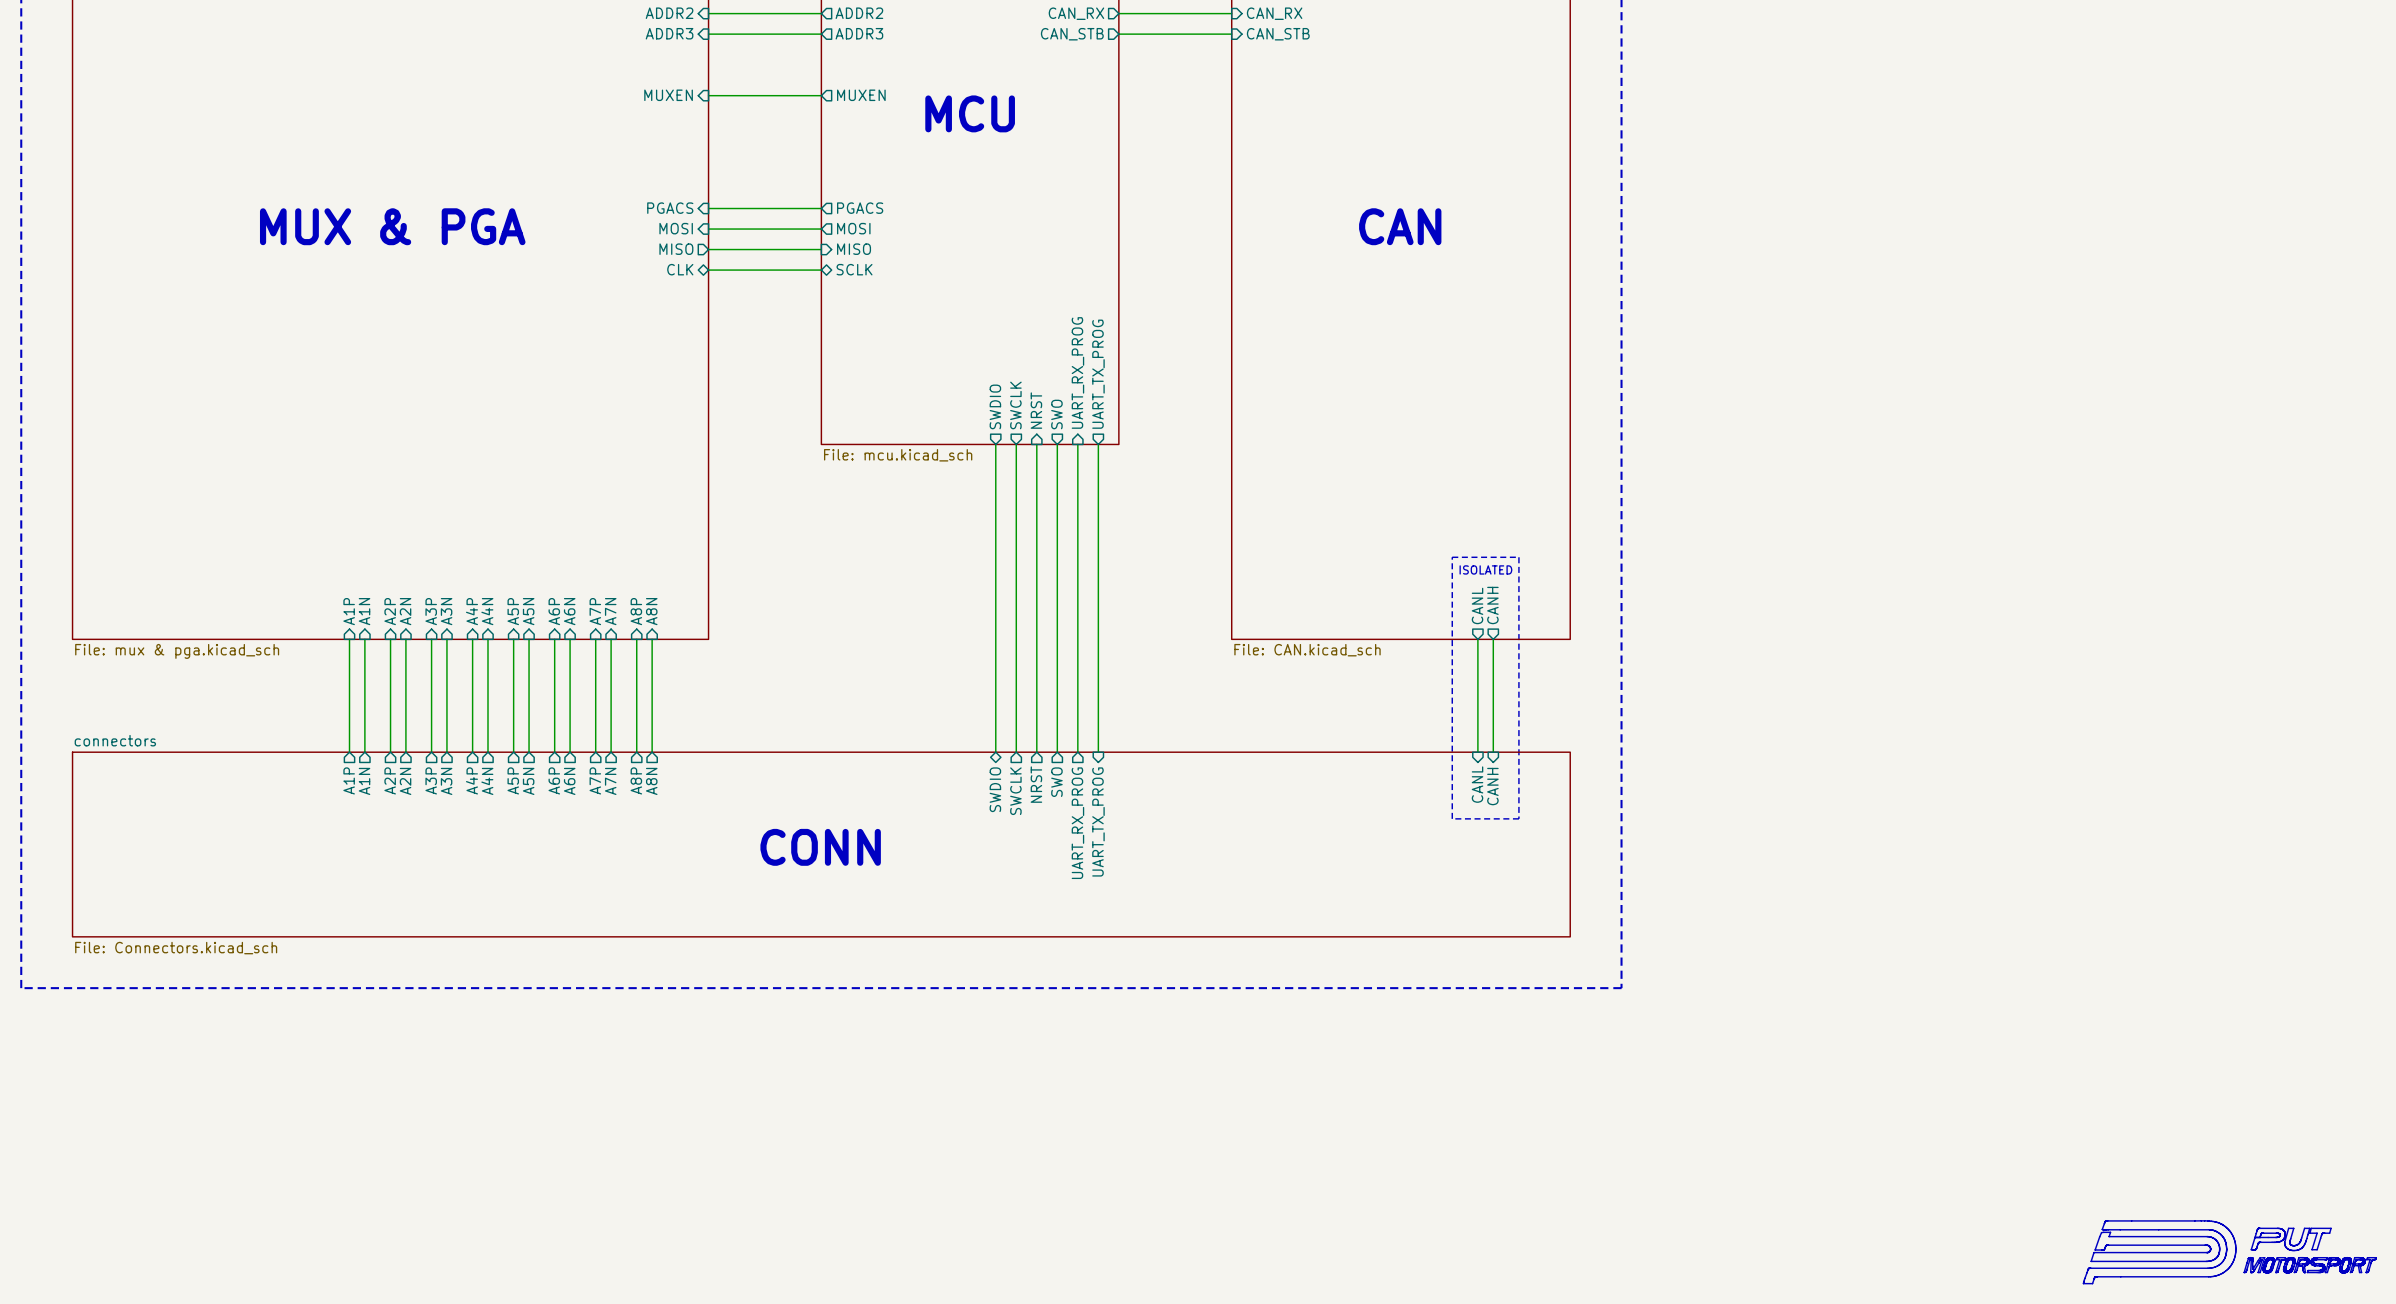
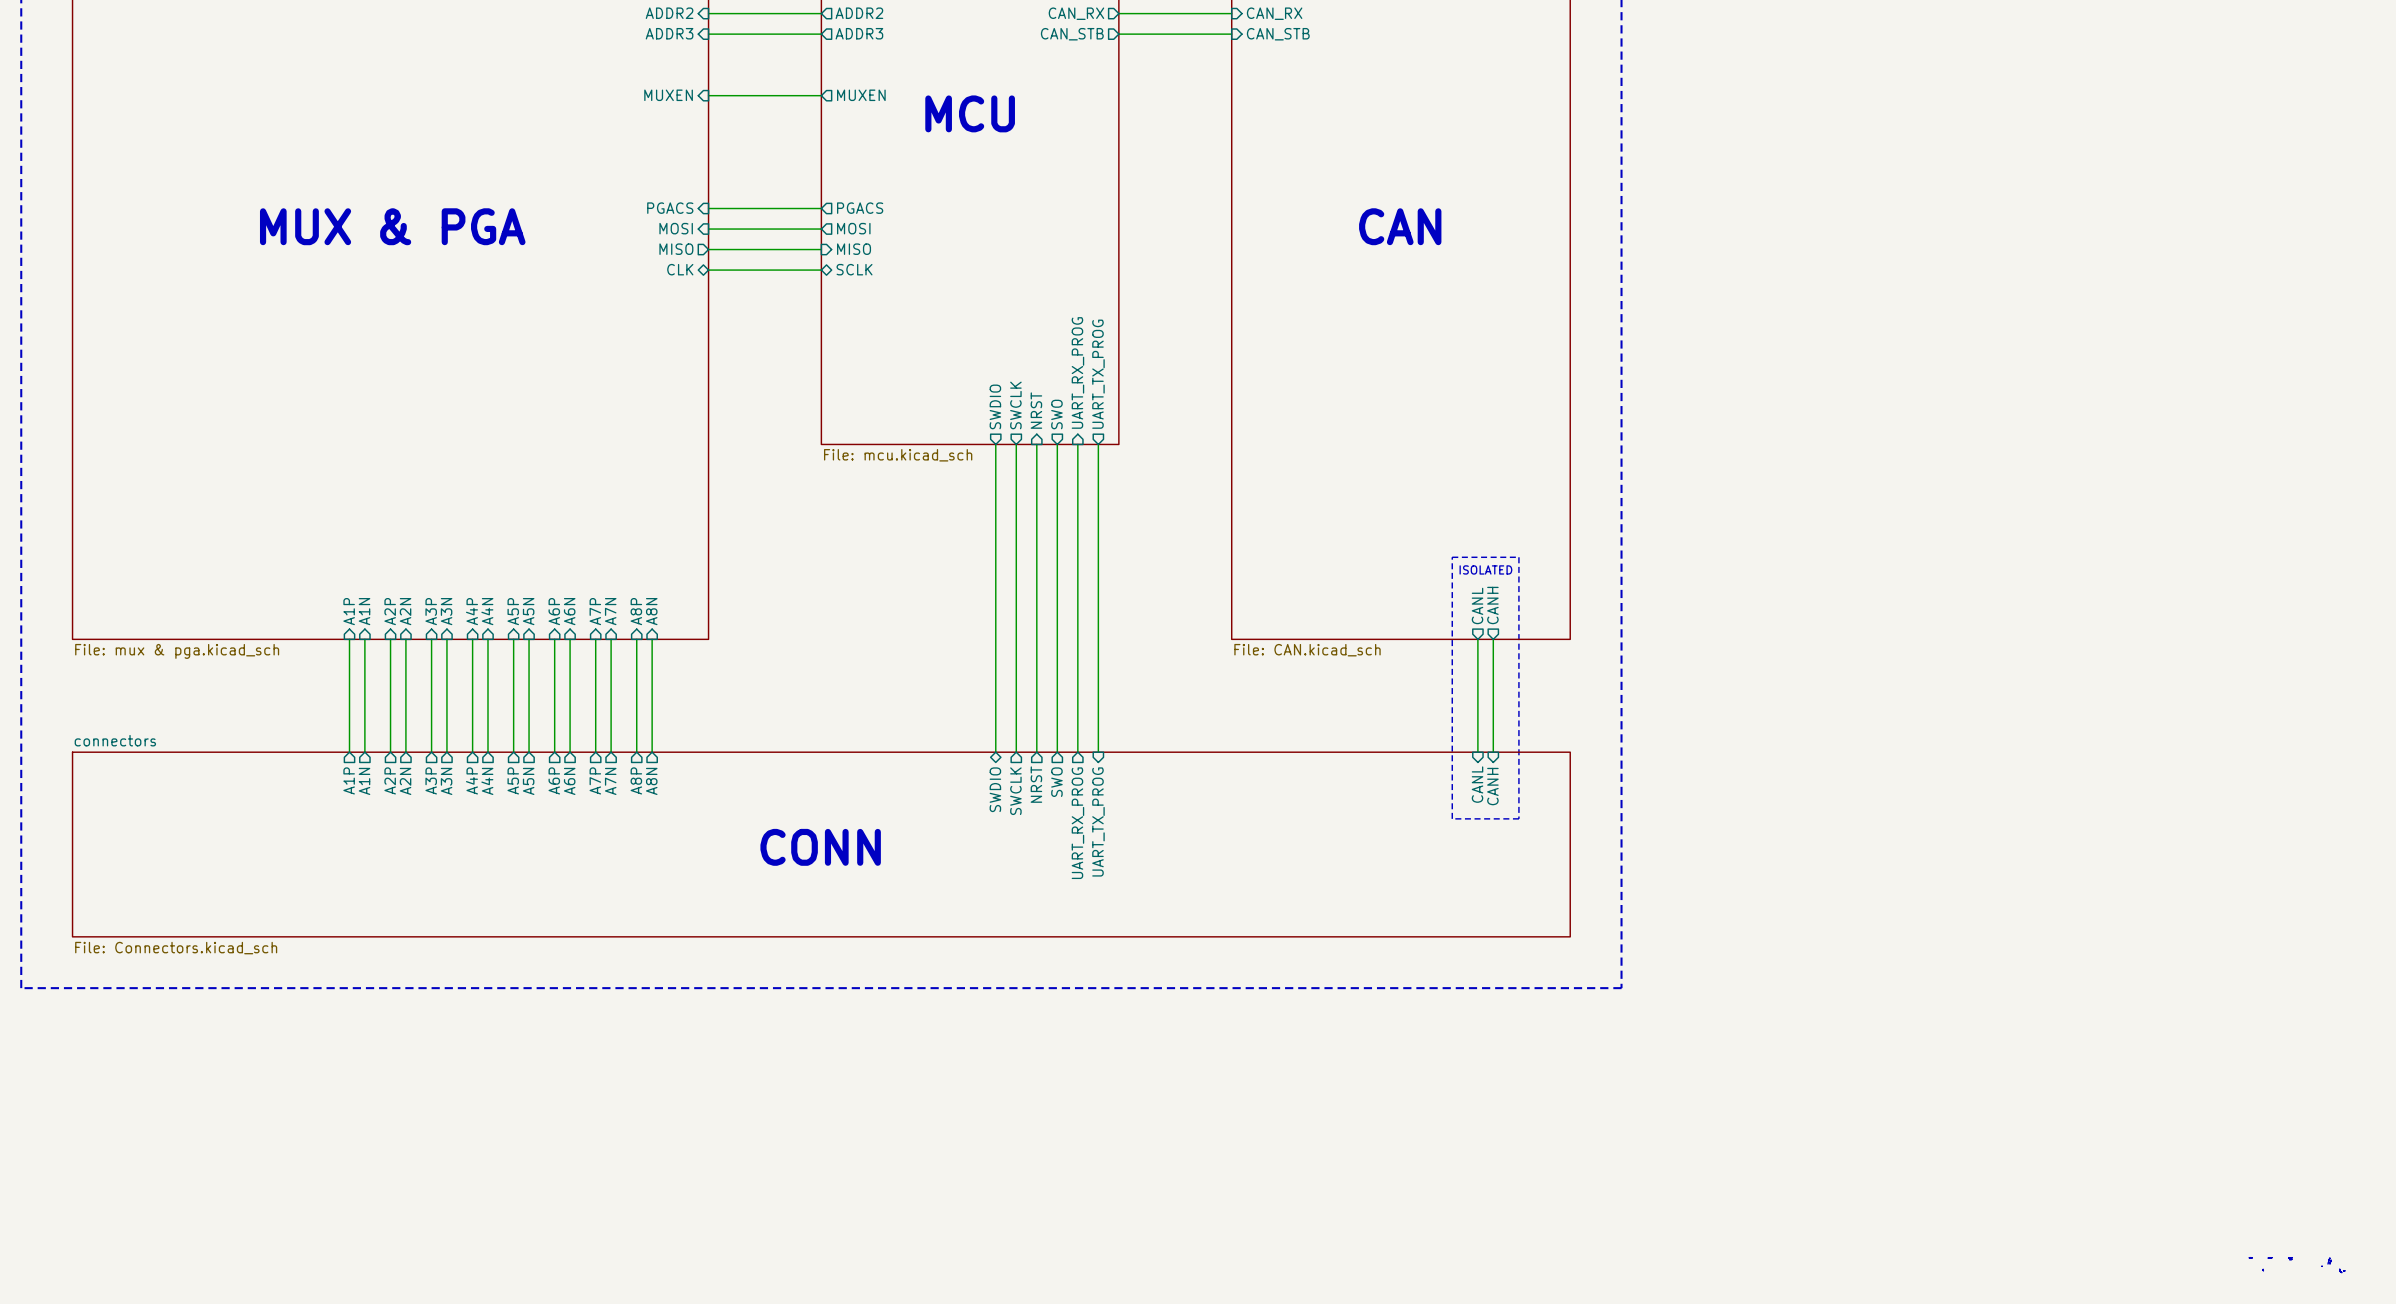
line: (2106, 1220) (2216, 1222) (2224, 1226) (2232, 1234) (2235, 1244) (2235, 1255) (2227, 1269) (2213, 1276) (2096, 1276) -> none
line: (2105, 1221) (2102, 1229) (2213, 1230) (2220, 1234) (2224, 1239) (2225, 1255) (2219, 1264) (2210, 1268) (2090, 1268) -> none
line: (2257, 1228) (2255, 1237) -> none
line: (2259, 1228) (2280, 1228) (2285, 1234) (2283, 1238) (2279, 1241) (2260, 1242) -> none
line: (2261, 1233) (2260, 1237) -> none
line: (2262, 1233) (2279, 1233) -> none
line: (2322, 1233) (2329, 1233) (2331, 1228) (2311, 1228) (2310, 1233) (2317, 1233) (2311, 1249) (2317, 1249) (2322, 1233) -> none
line: (2279, 1236) (2255, 1237) -> none
line: (2255, 1237) (2251, 1249) (2255, 1249) -> none
line: (2258, 1242) (2256, 1249) -> none
line: (2289, 1242) (2293, 1228) (2288, 1228) (2284, 1244) (2287, 1248) (2293, 1250) (2299, 1249) (2303, 1245) (2309, 1228) (2304, 1228) (2298, 1244) (2293, 1245) (2289, 1243) -> none
line: (2107, 1245) (2208, 1245) -> none
line: (2105, 1246) (2104, 1249) -> none
line: (2209, 1246) (2210, 1250) (2207, 1252) (2094, 1252) (2091, 1261) (2207, 1261) (2215, 1258) (2219, 1251) (2217, 1241) (2209, 1236) (2109, 1236) (2110, 1232) (2103, 1232) (2101, 1232) (2095, 1250) (2102, 1250) -> none
line: (2272, 1257) (2274, 1261) (2271, 1270) (2267, 1272) (2263, 1271) -> none
line: (2293, 1257) (2295, 1261) (2291, 1271) (2286, 1272) (2283, 1269) -> none
line: (2331, 1257) (2338, 1258) (2340, 1261) (2338, 1265) (2330, 1265) -> none
line: (2358, 1257) (2354, 1257) (2350, 1272) (2354, 1265) (2358, 1265) (2359, 1272) (2361, 1272) (2360, 1265) (2364, 1264) (2365, 1260) (2358, 1257) -> none
line: (2248, 1258) (2245, 1272) -> none
line: (2252, 1258) (2253, 1269) (2260, 1257) (2264, 1257) (2260, 1272) (2258, 1272) (2261, 1259) -> none
line: (2266, 1258) (2263, 1268) (2265, 1269) -> none
line: (2287, 1258) (2283, 1268) (2285, 1269) -> none
line: (2327, 1258) (2313, 1258) (2311, 1261) (2311, 1264) -> none
line: (2375, 1258) (2367, 1257) (2366, 1259) (2370, 1259) (2367, 1272) -> none
line: (2270, 1259) (2267, 1261) (2265, 1269) -> none
line: (2271, 1259) (2272, 1261) (2269, 1269) -> none
line: (2282, 1259) (2285, 1257) (2277, 1257) (2276, 1259) (2279, 1259) (2277, 1272) -> none
line: (2301, 1259) (2306, 1259) -> none
line: (2325, 1259) (2314, 1260) -> none
line: (2332, 1259) (2337, 1259) -> none
line: (2347, 1259) (2345, 1259) -> none
line: (2347, 1259) (2349, 1261) (2346, 1269) -> none
line: (2357, 1259) (2362, 1259) -> none
line: (2374, 1259) (2373, 1259) -> none
line: (2260, 1260) (2253, 1272) -> none
line: (2281, 1260) (2277, 1271) -> none
line: (2288, 1260) (2285, 1269) -> none
line: (2293, 1260) (2290, 1269) -> none
line: (2299, 1260) (2298, 1263) -> none
line: (2344, 1260) (2341, 1269) -> none
line: (2356, 1260) (2354, 1263) -> none
line: (2372, 1260) (2368, 1271) -> none
line: (2338, 1261) (2327, 1263) (2325, 1272) (2327, 1272) (2328, 1267) -> none
line: (2306, 1263) (2296, 1263) -> none
line: (2315, 1263) (2323, 1264) (2323, 1271) (2307, 1272) (2308, 1270) (2321, 1269) -> none
line: (2362, 1263) (2352, 1263) -> none
line: (2312, 1264) (2321, 1265) -> none
line: (2301, 1265) (2298, 1265) (2294, 1272) (2298, 1257) (2308, 1259) (2308, 1263) (2304, 1265) (2304, 1272) -> none
line: (2302, 1266) (2303, 1271) -> none
line: (2088, 1268) (2083, 1283) (2092, 1283) (2094, 1278) -> none
line: (2341, 1269) (2339, 1268) (2342, 1259) (2350, 1258) (2351, 1261) (2348, 1270) (2342, 1272) -> none
line: (2246, 1271) (2251, 1259) (2251, 1272) -> none

